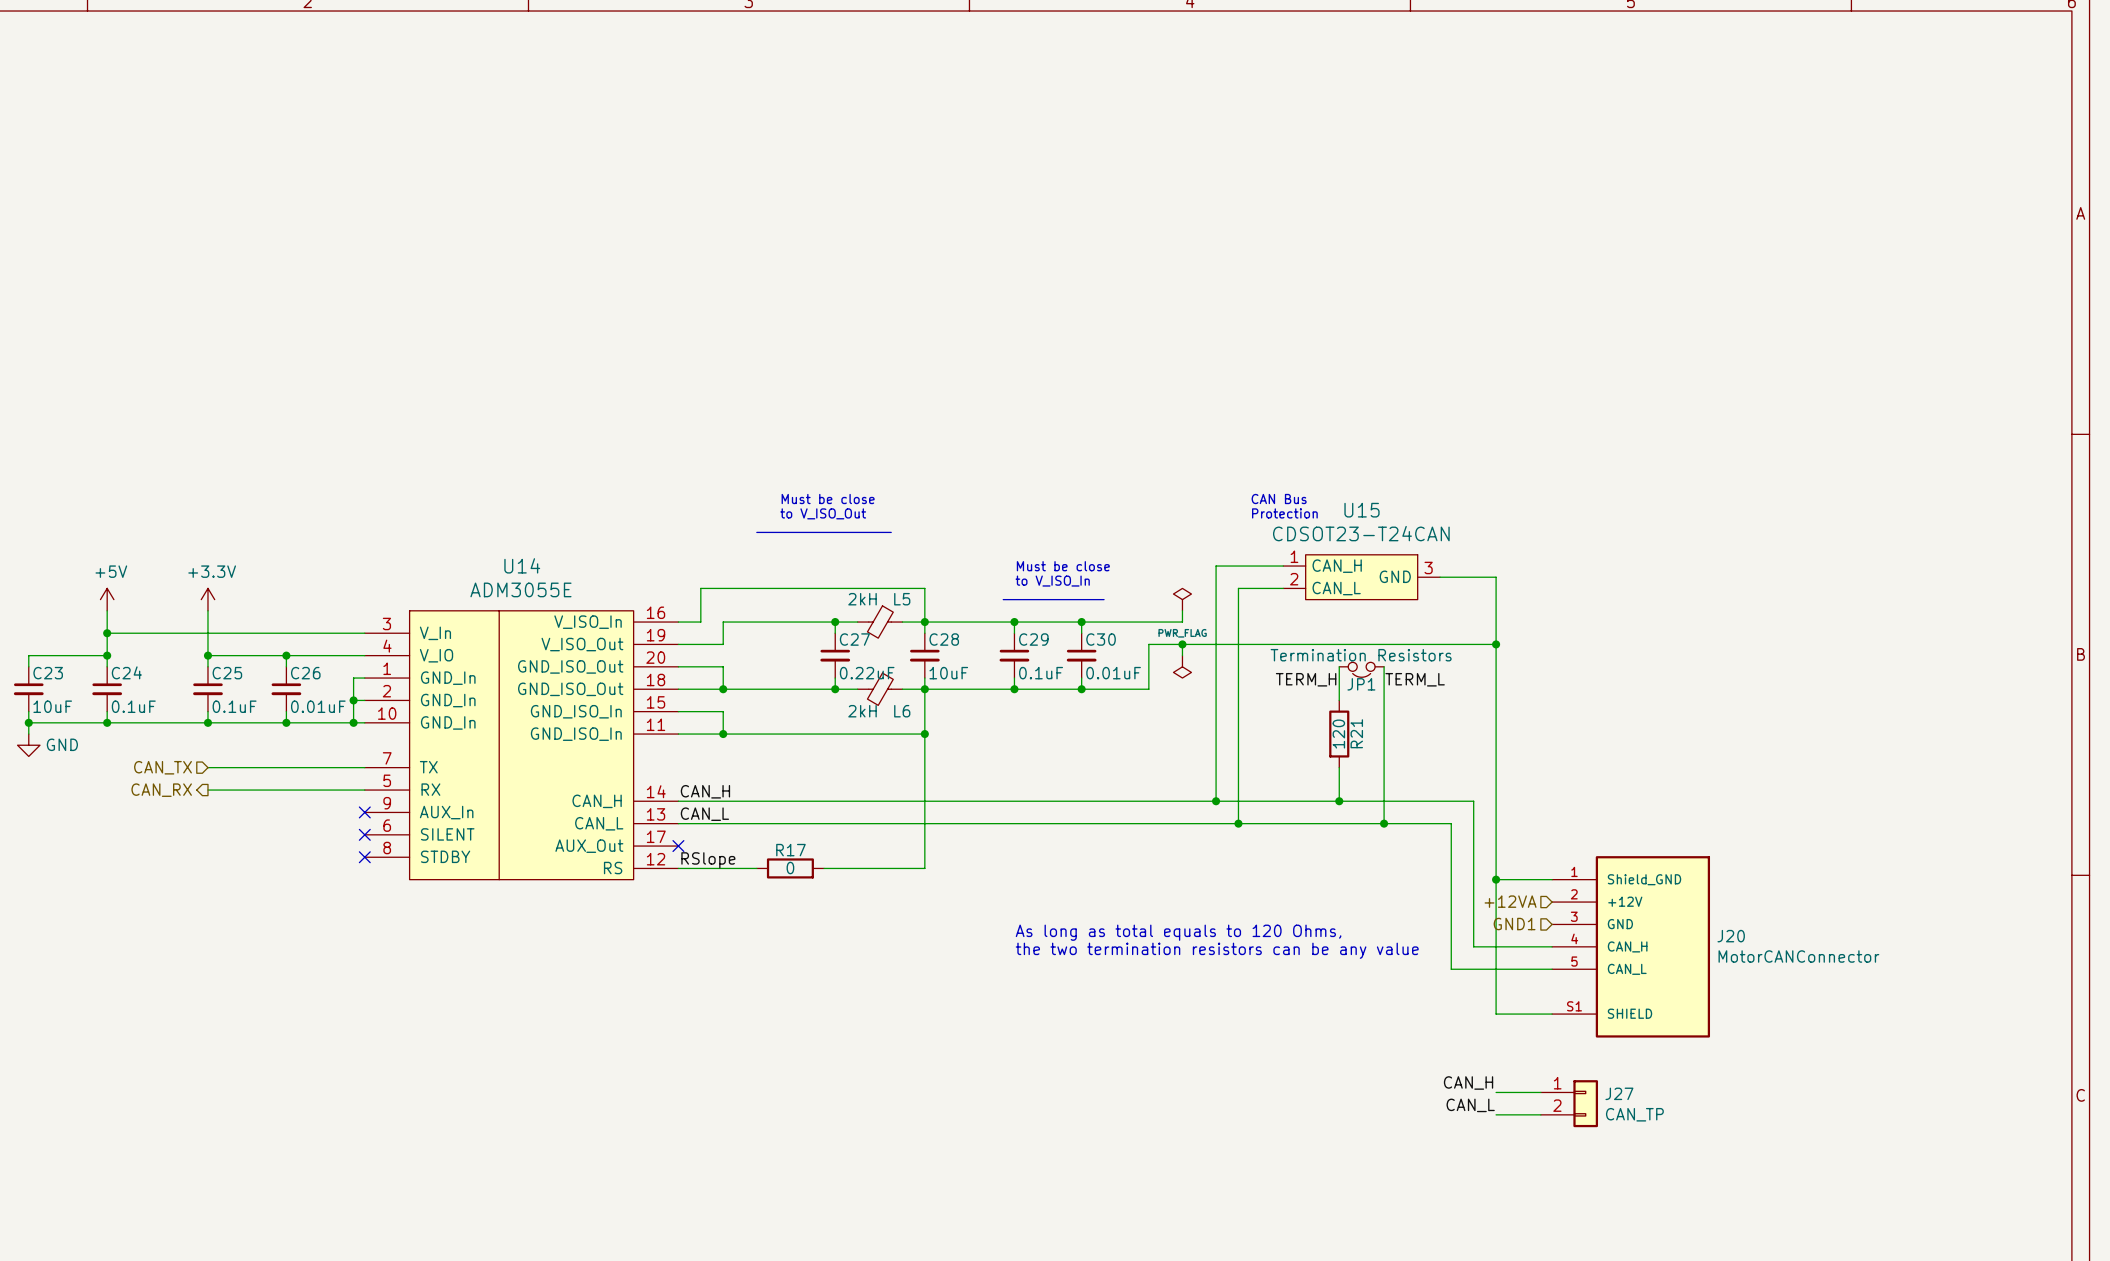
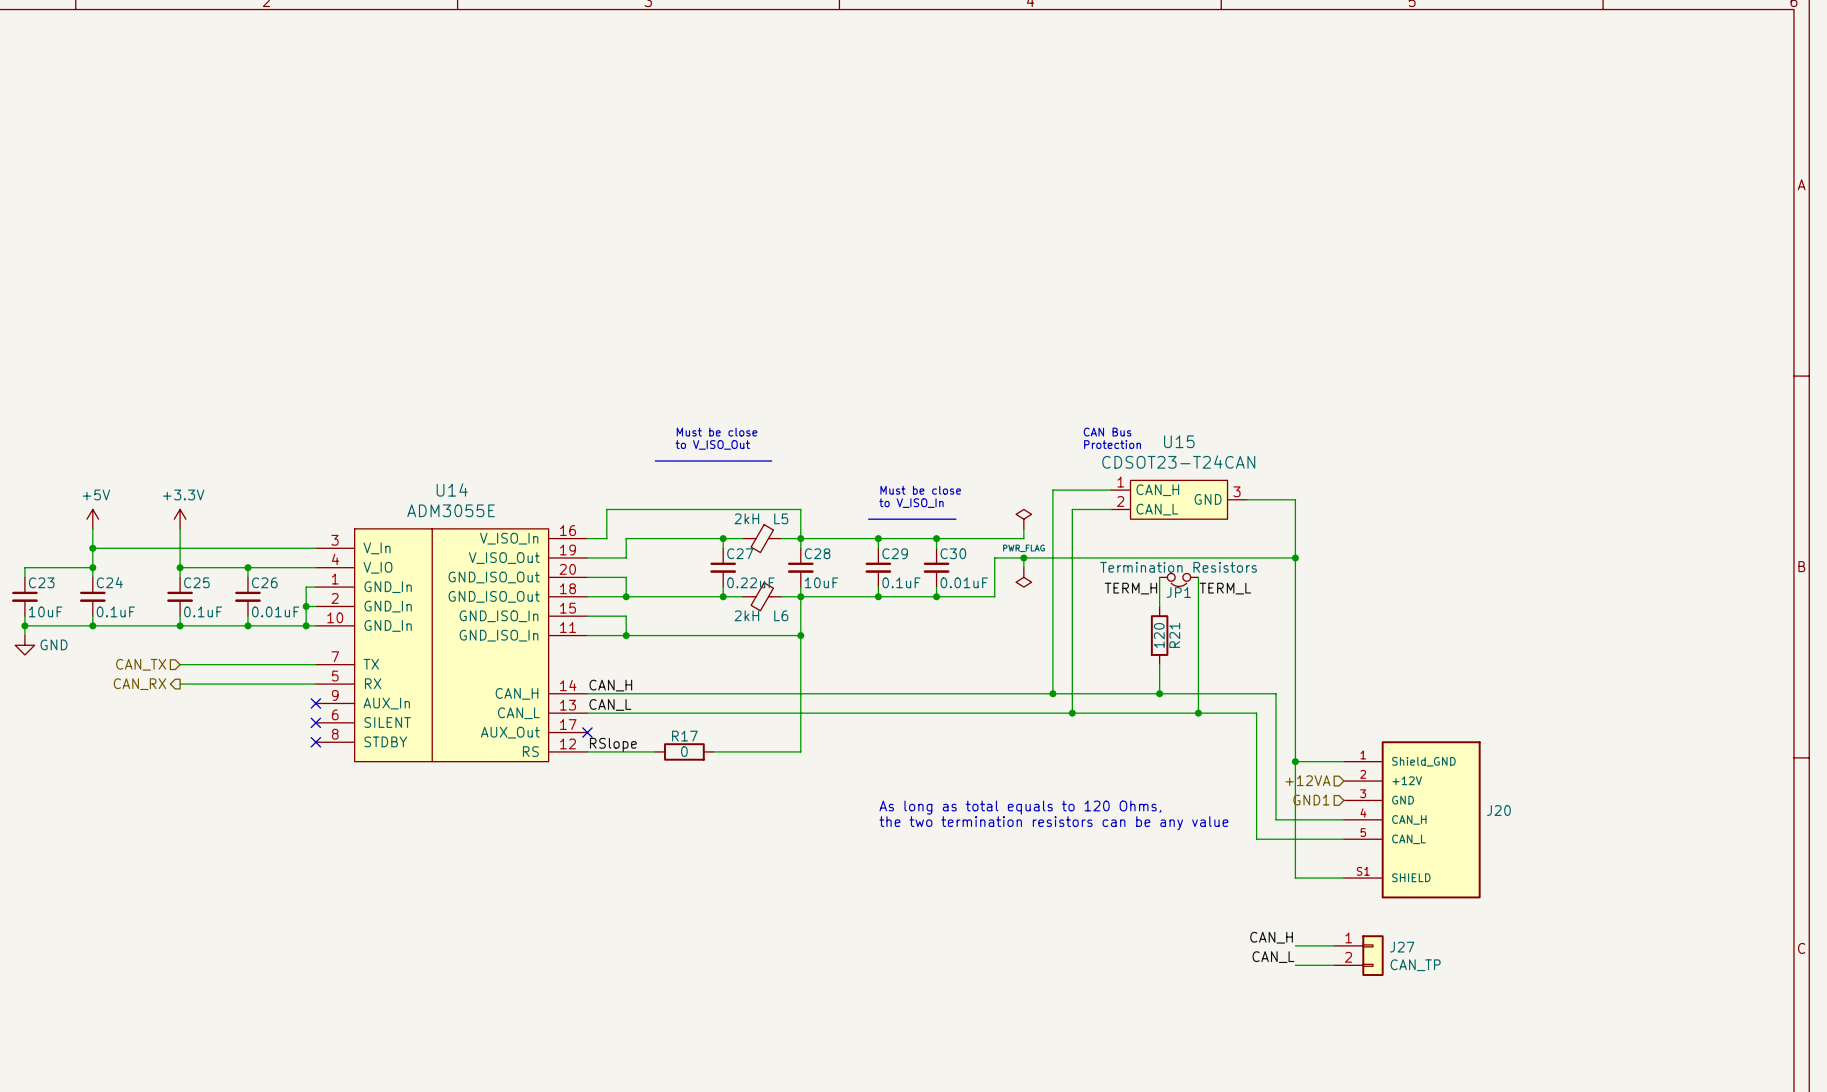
J20 value: MotorCANConnector (1798, 956) -> none

